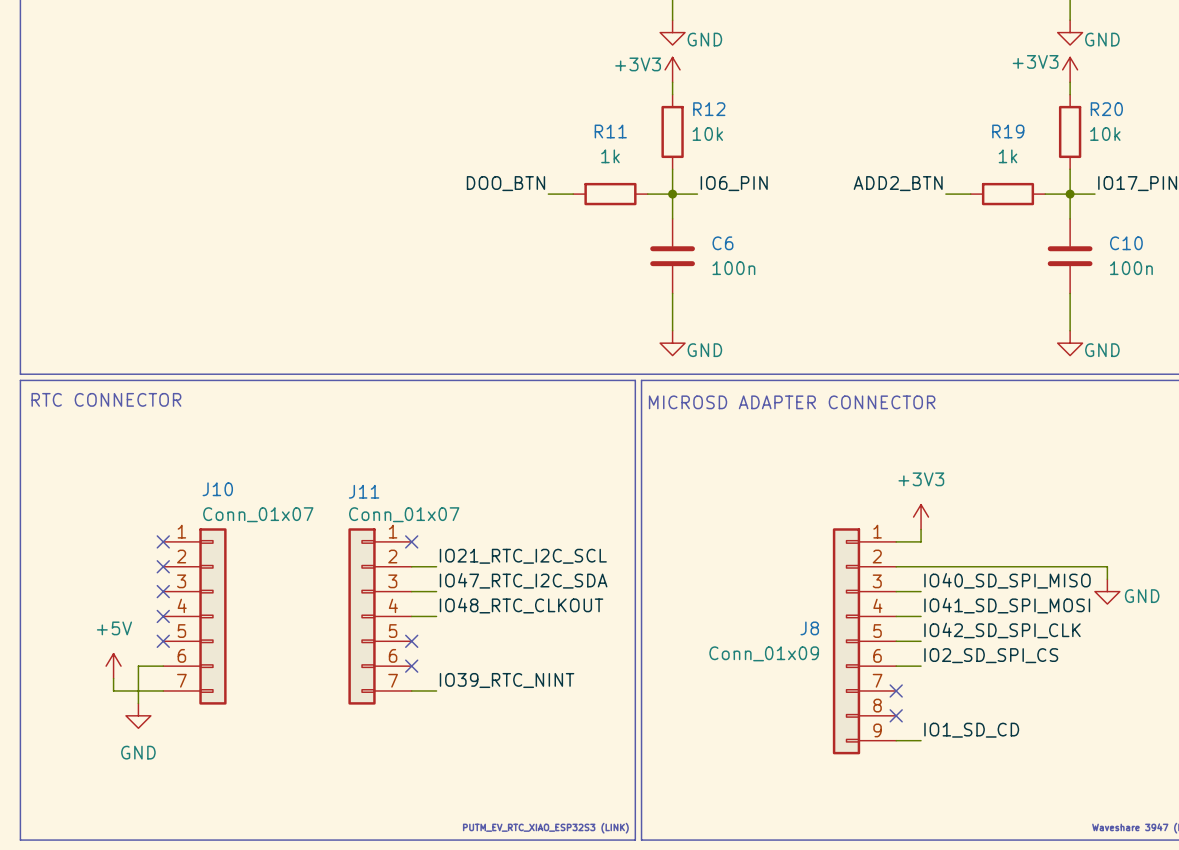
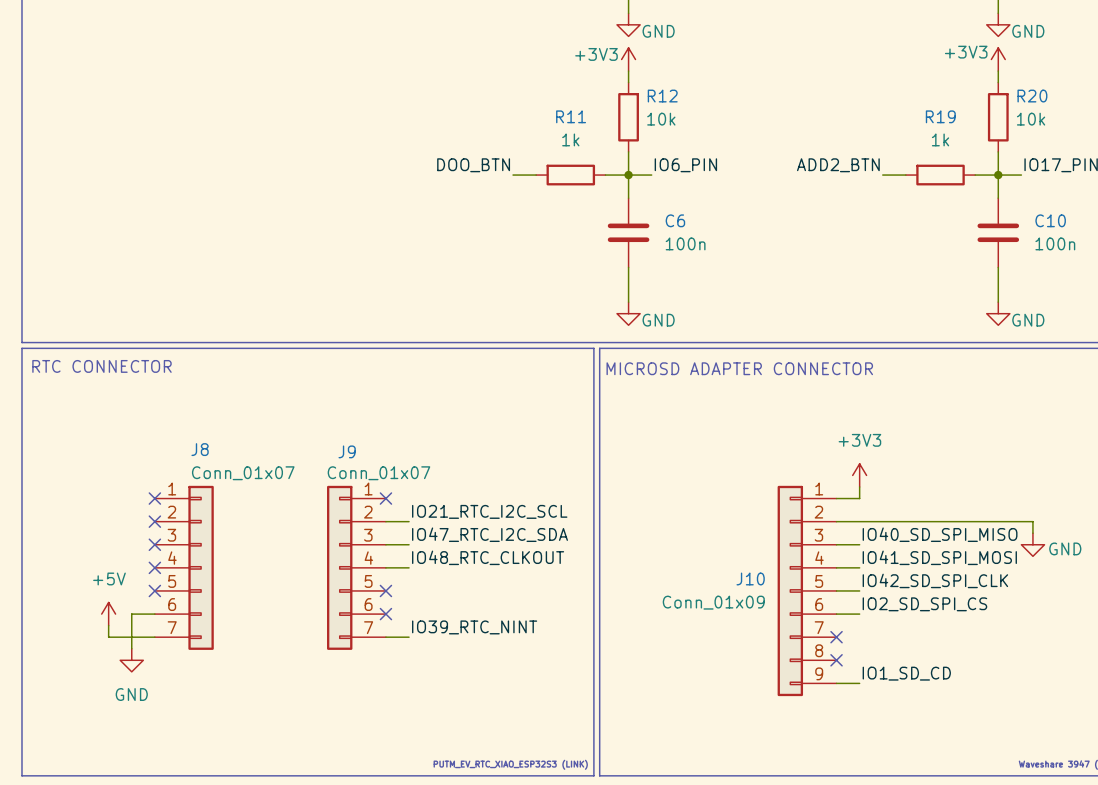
J10 name: J10 (217, 489) -> J8 (200, 449)
J11 name: J11 (364, 491) -> J9 (347, 451)
J8 name: J8 (809, 628) -> J10 (750, 578)

